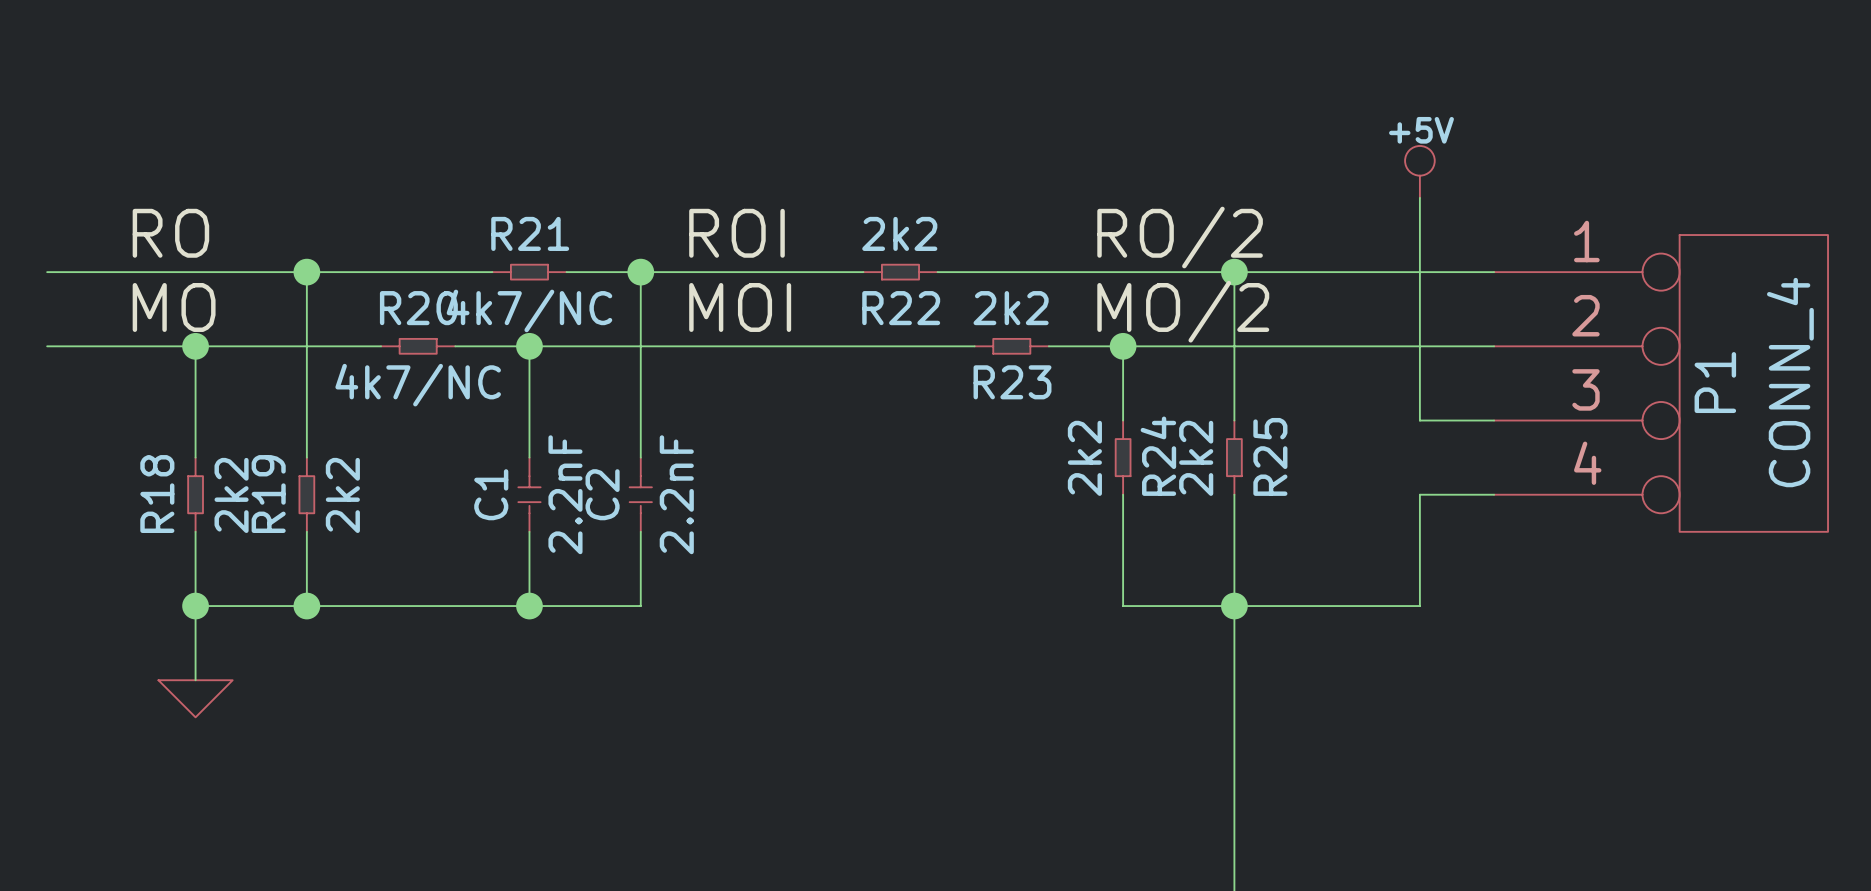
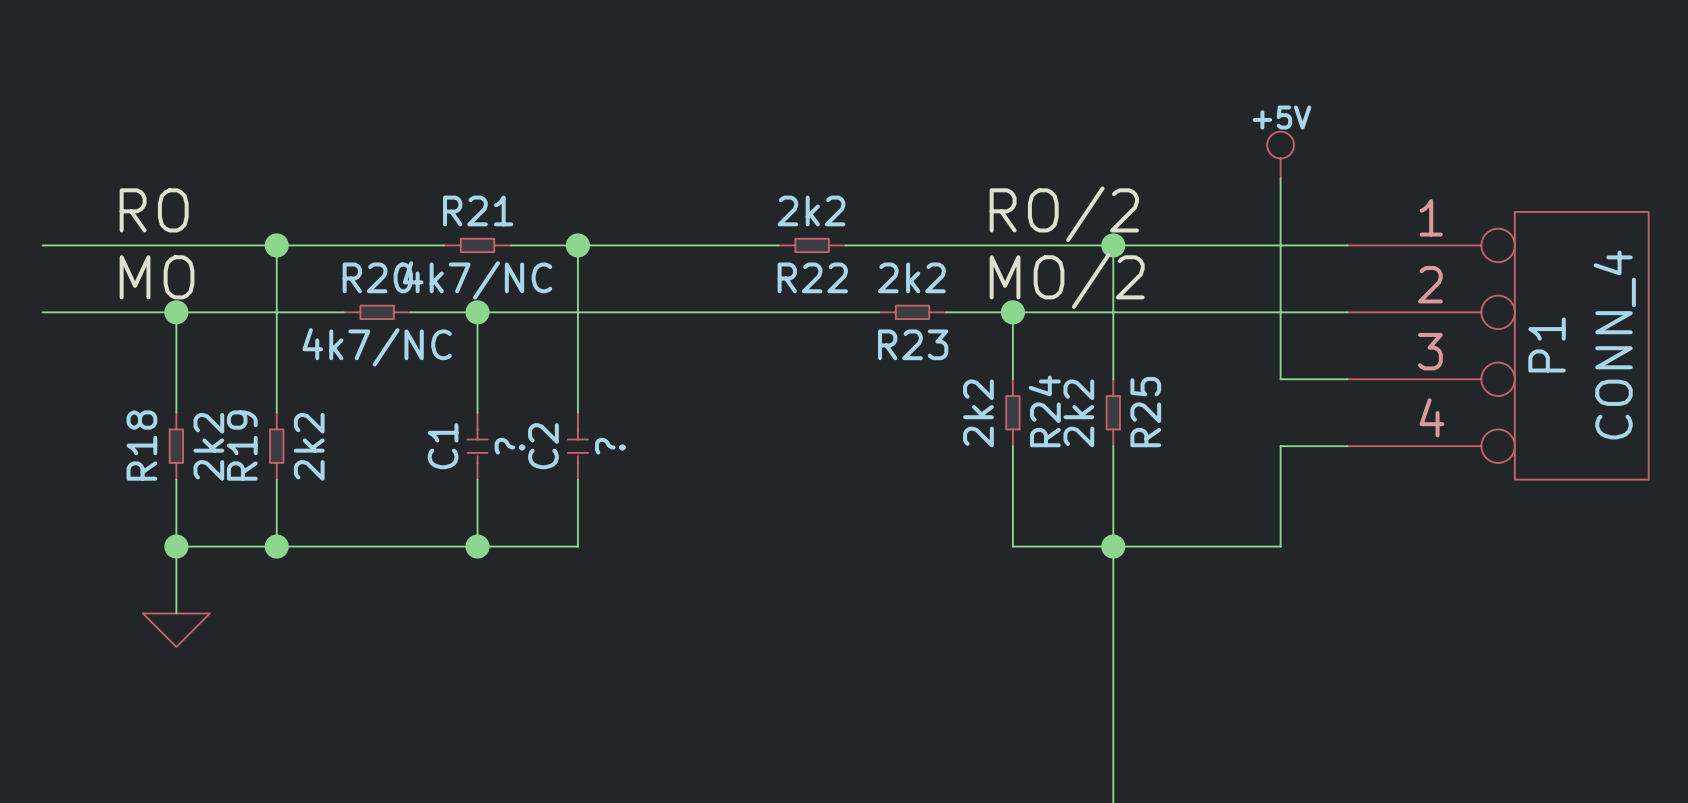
label: ROI (736, 233) -> none
label: MOI (740, 307) -> none
C1 value: 2.2nF (565, 494) -> ? (509, 446)
C2 value: 2.2nF (676, 494) -> ? (610, 446)

